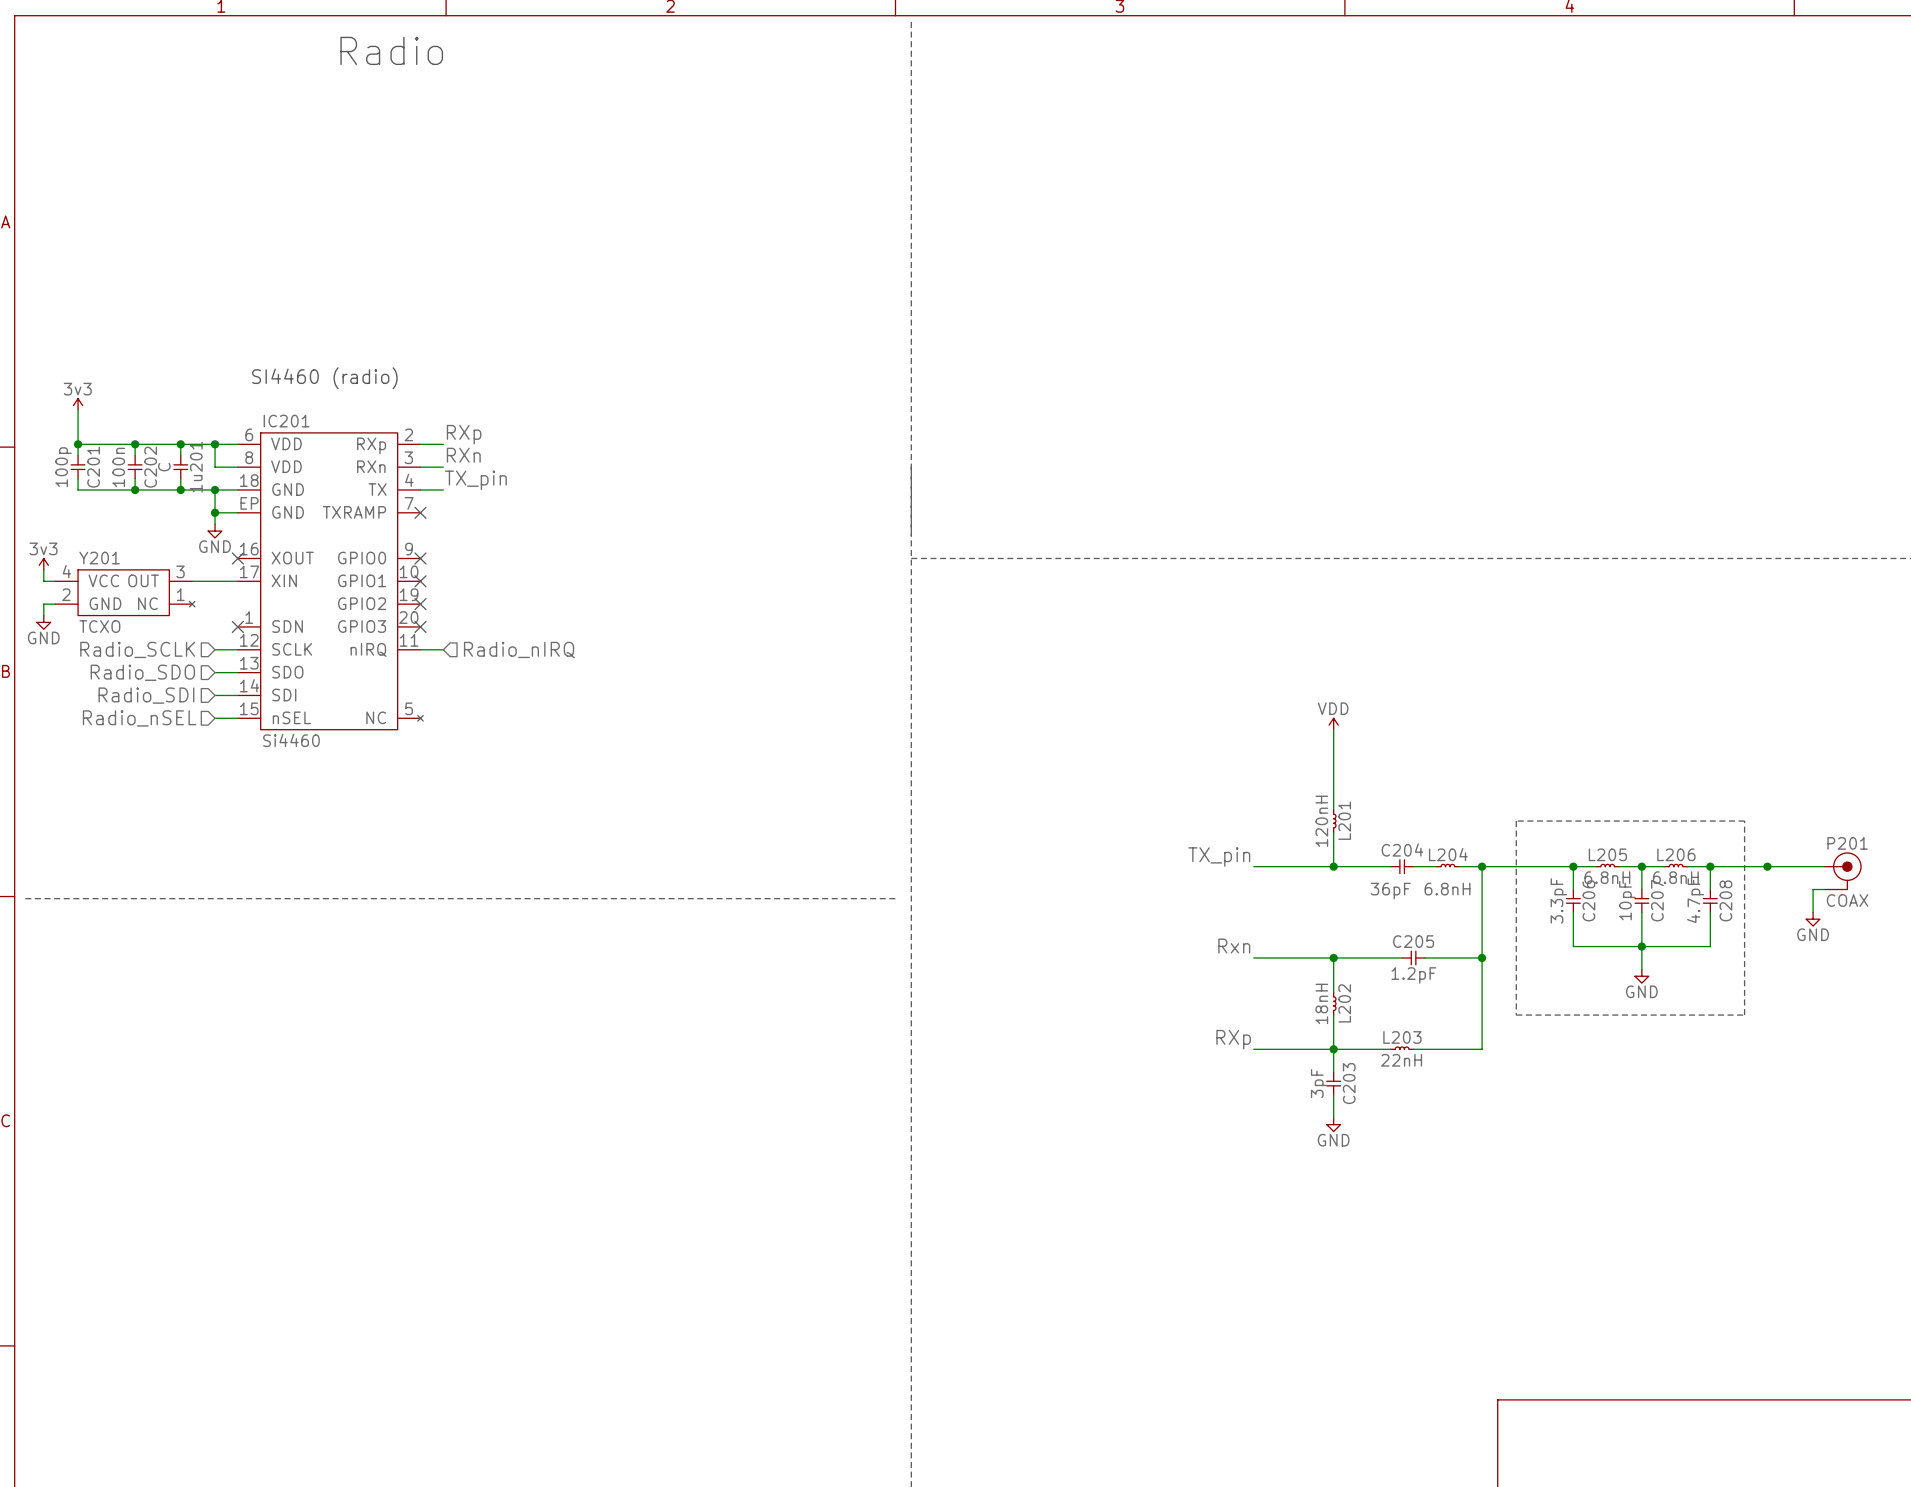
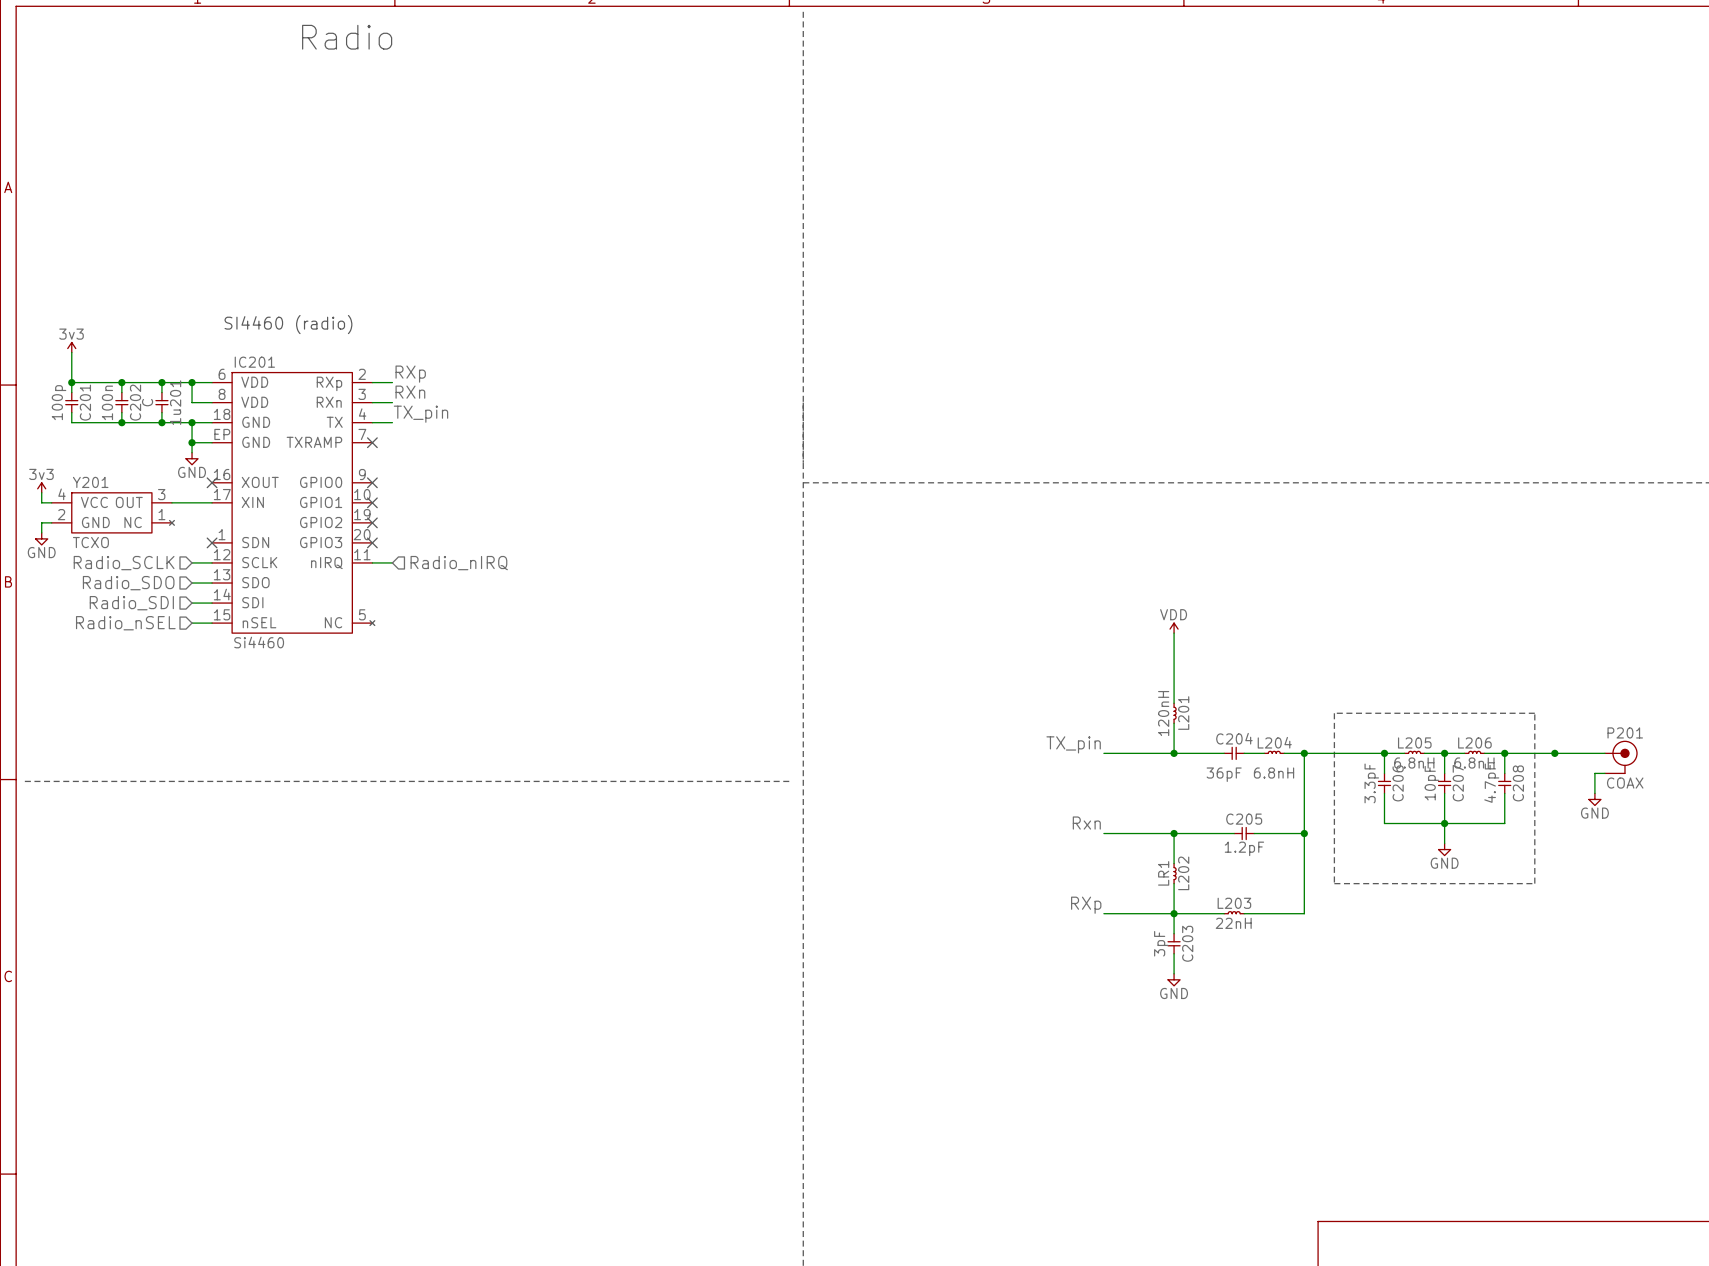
L202 value: 18nH (1321, 1003) -> LR1 (1163, 873)

